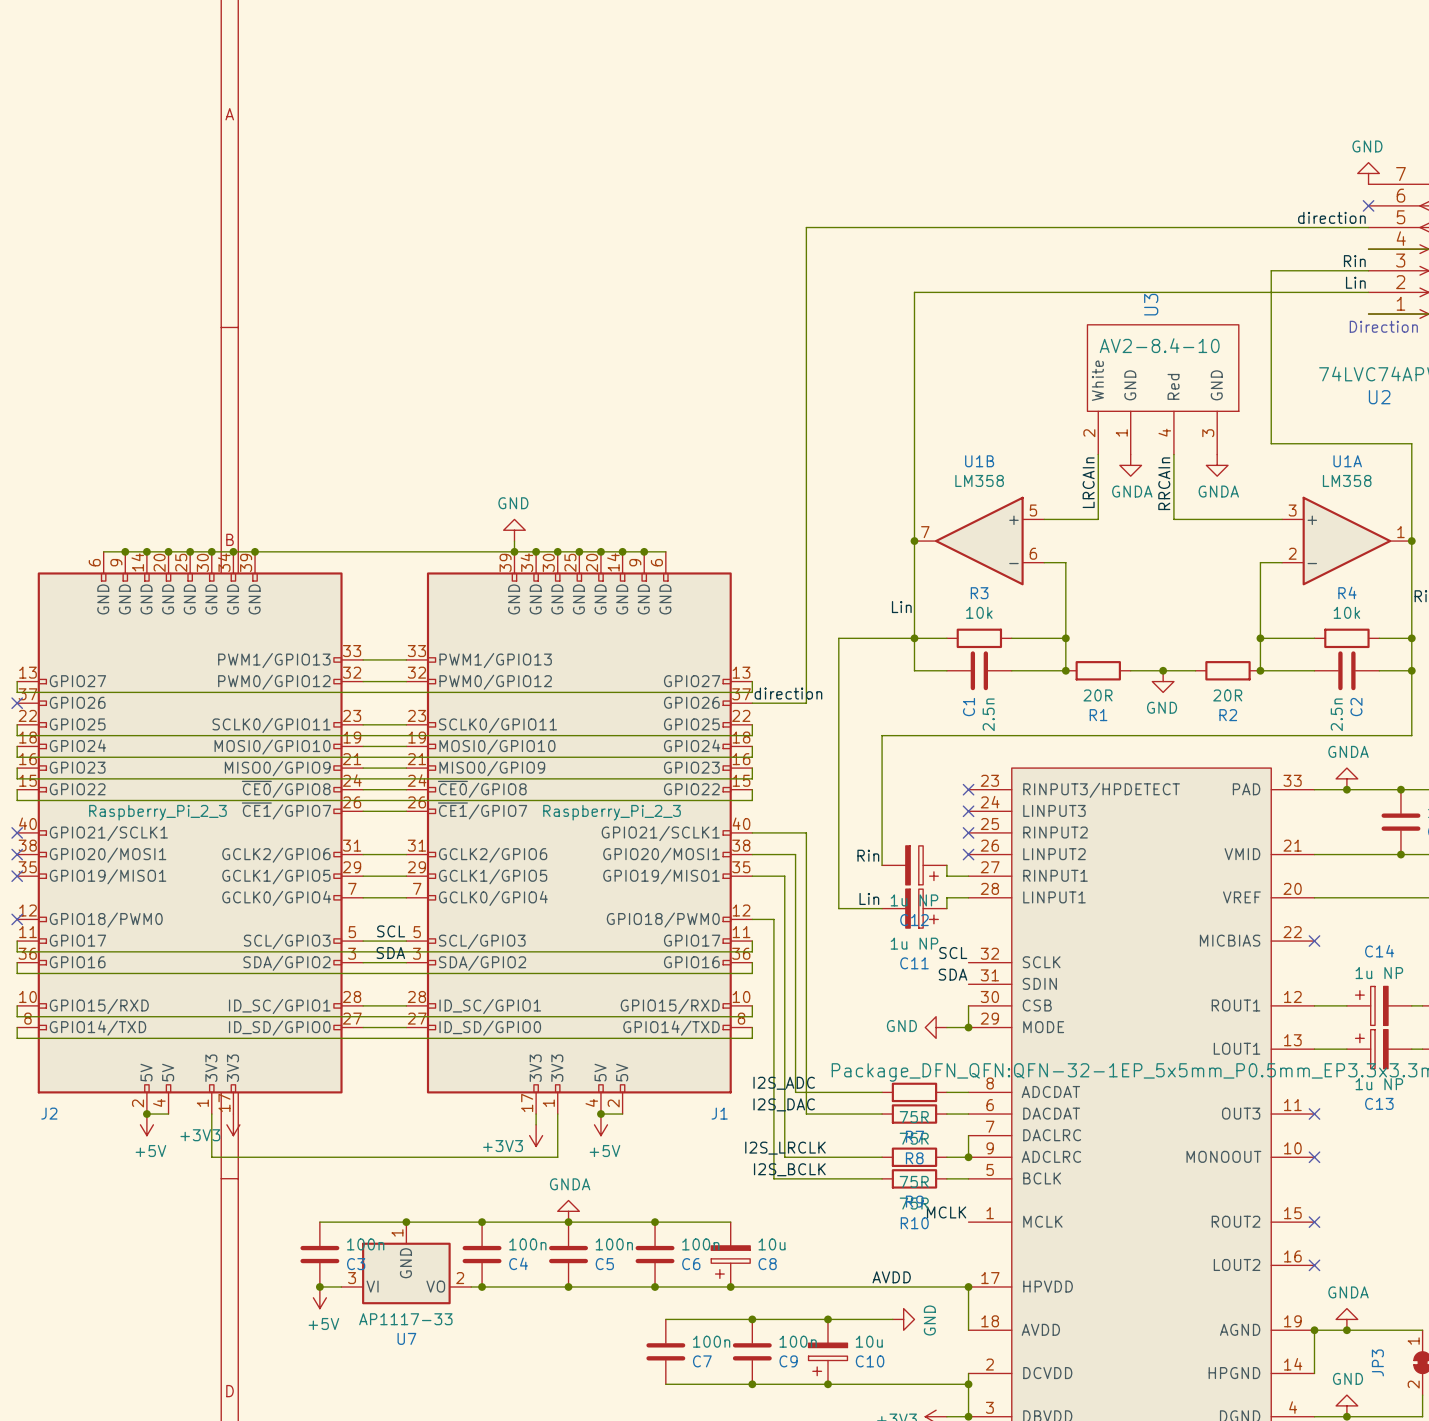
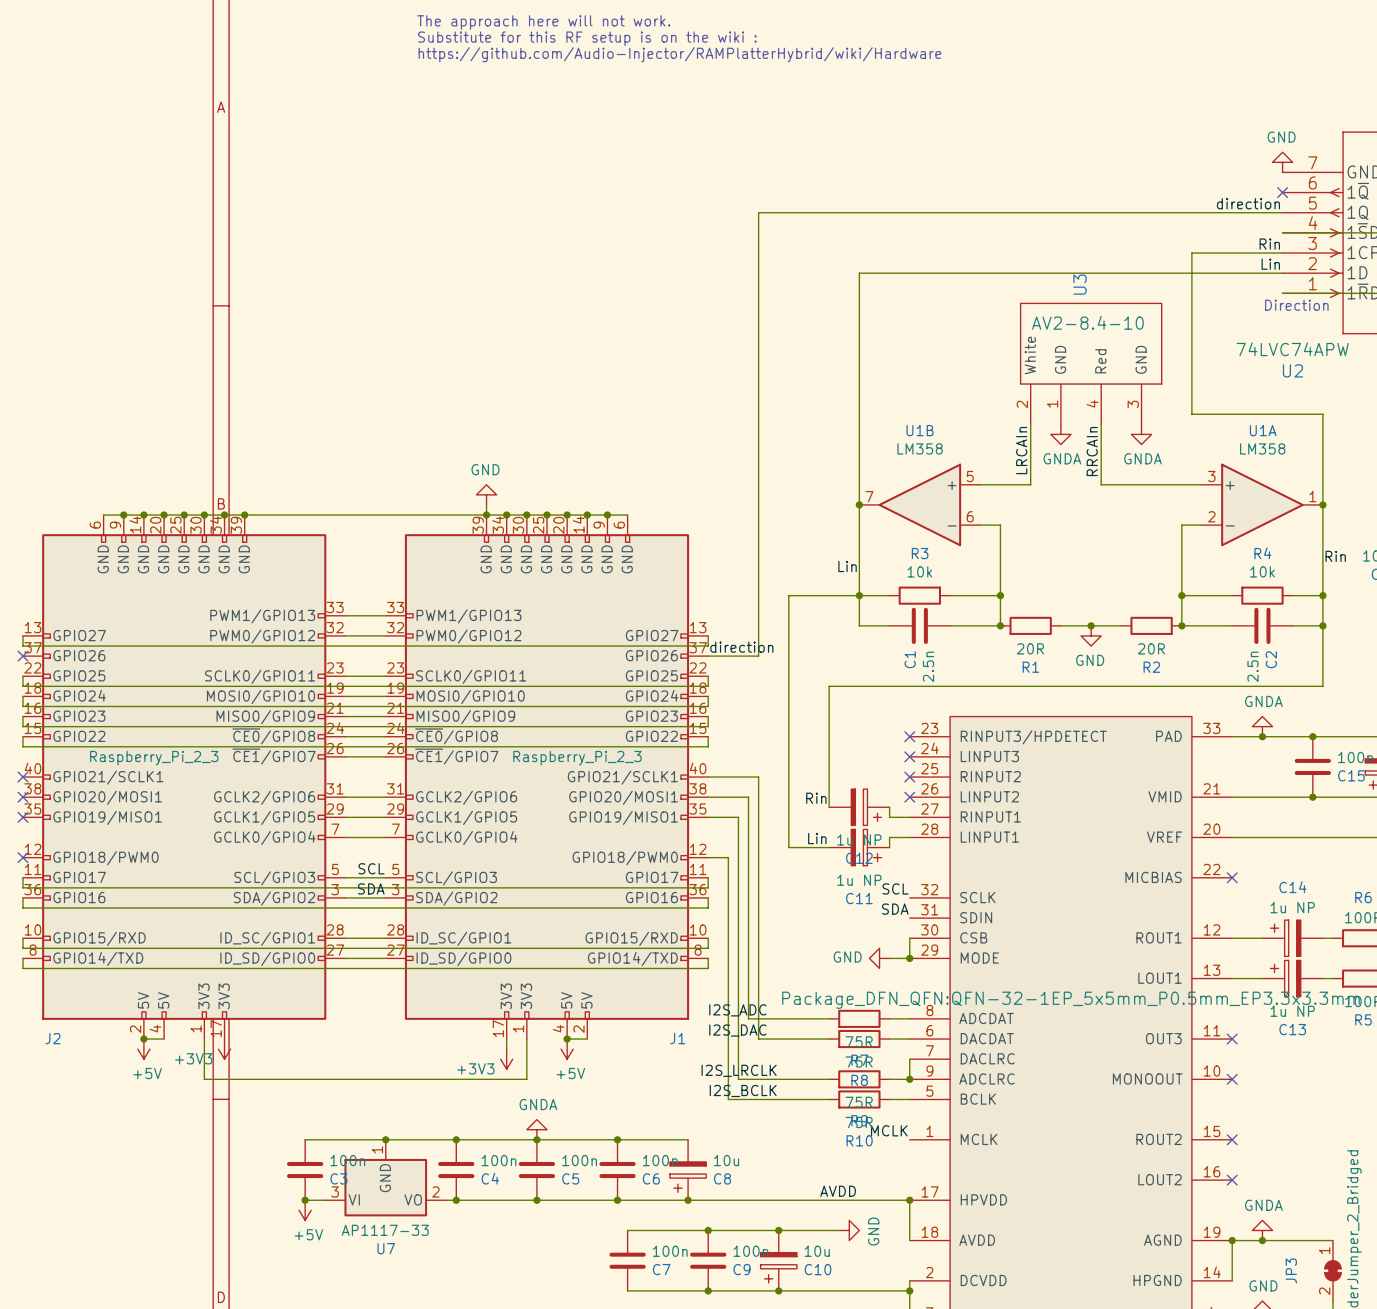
text: none -> The approach here will not work. (543, 22)
text: none -> Substitute for this RF setup is on the wiki : (587, 38)
text: none -> https://github.com/Audio-Injector/RAMPlatterHybrid/wiki/Hardware (679, 54)

